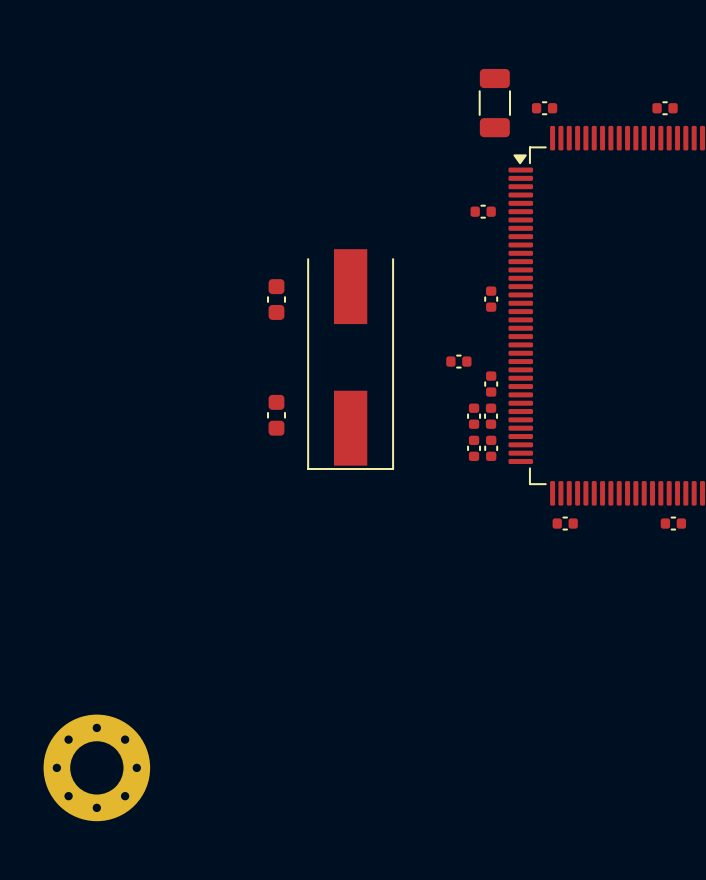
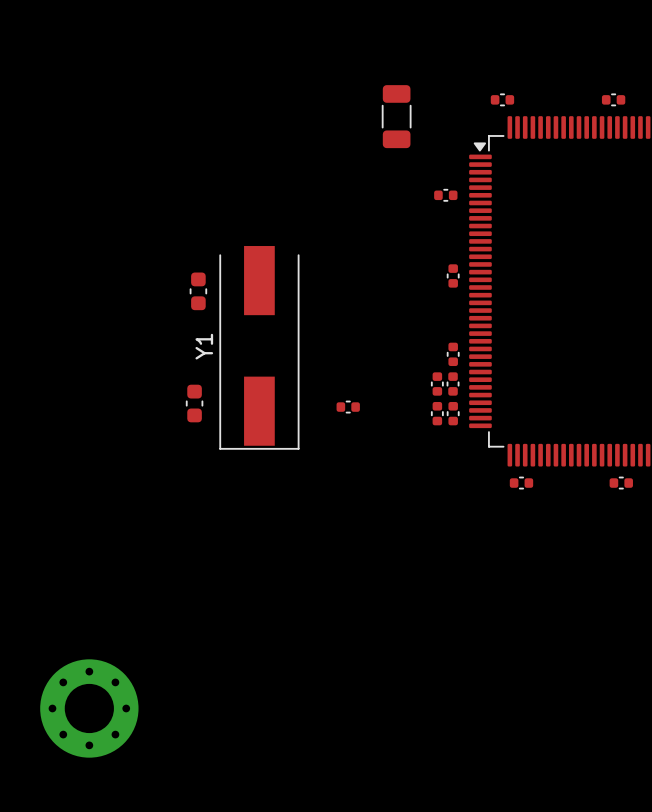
part position: (494, 103) -> (396, 116)
part: (276, 299) -> none
part: none -> (198, 291)
part: (350, 359) -> none
part position: (458, 361) -> (348, 407)
Y1: none -> (259, 347)
part: (276, 415) -> none
part: none -> (194, 403)

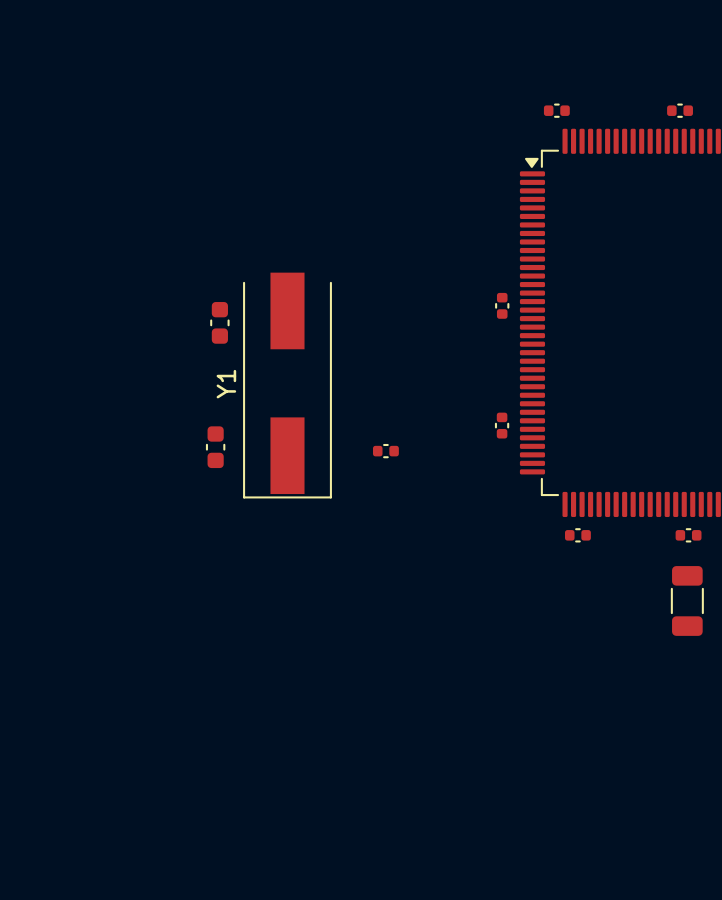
part: (396, 116) -> none
part: (445, 195) -> none
part: (453, 354) -> none
part: (437, 384) -> none
part: (437, 413) -> none
part: (453, 413) -> none
part: none -> (687, 600)
part: (89, 708) -> none

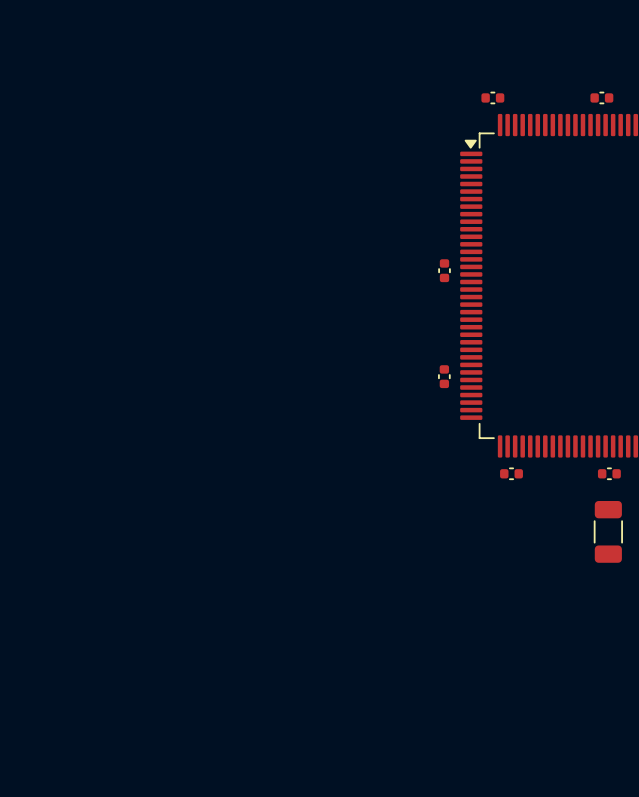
part: (219, 322) -> none
Y1: (287, 385) -> none
part: (215, 447) -> none
part: (385, 451) -> none

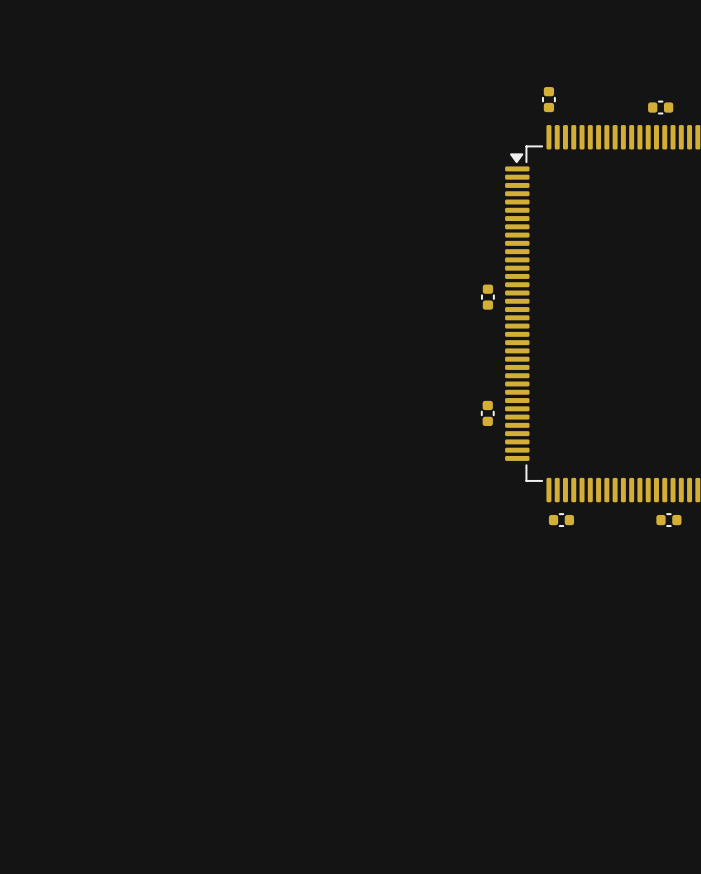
part rotation: 0° (492, 97) -> 90° clockwise (548, 99)
part: (608, 531) -> none

